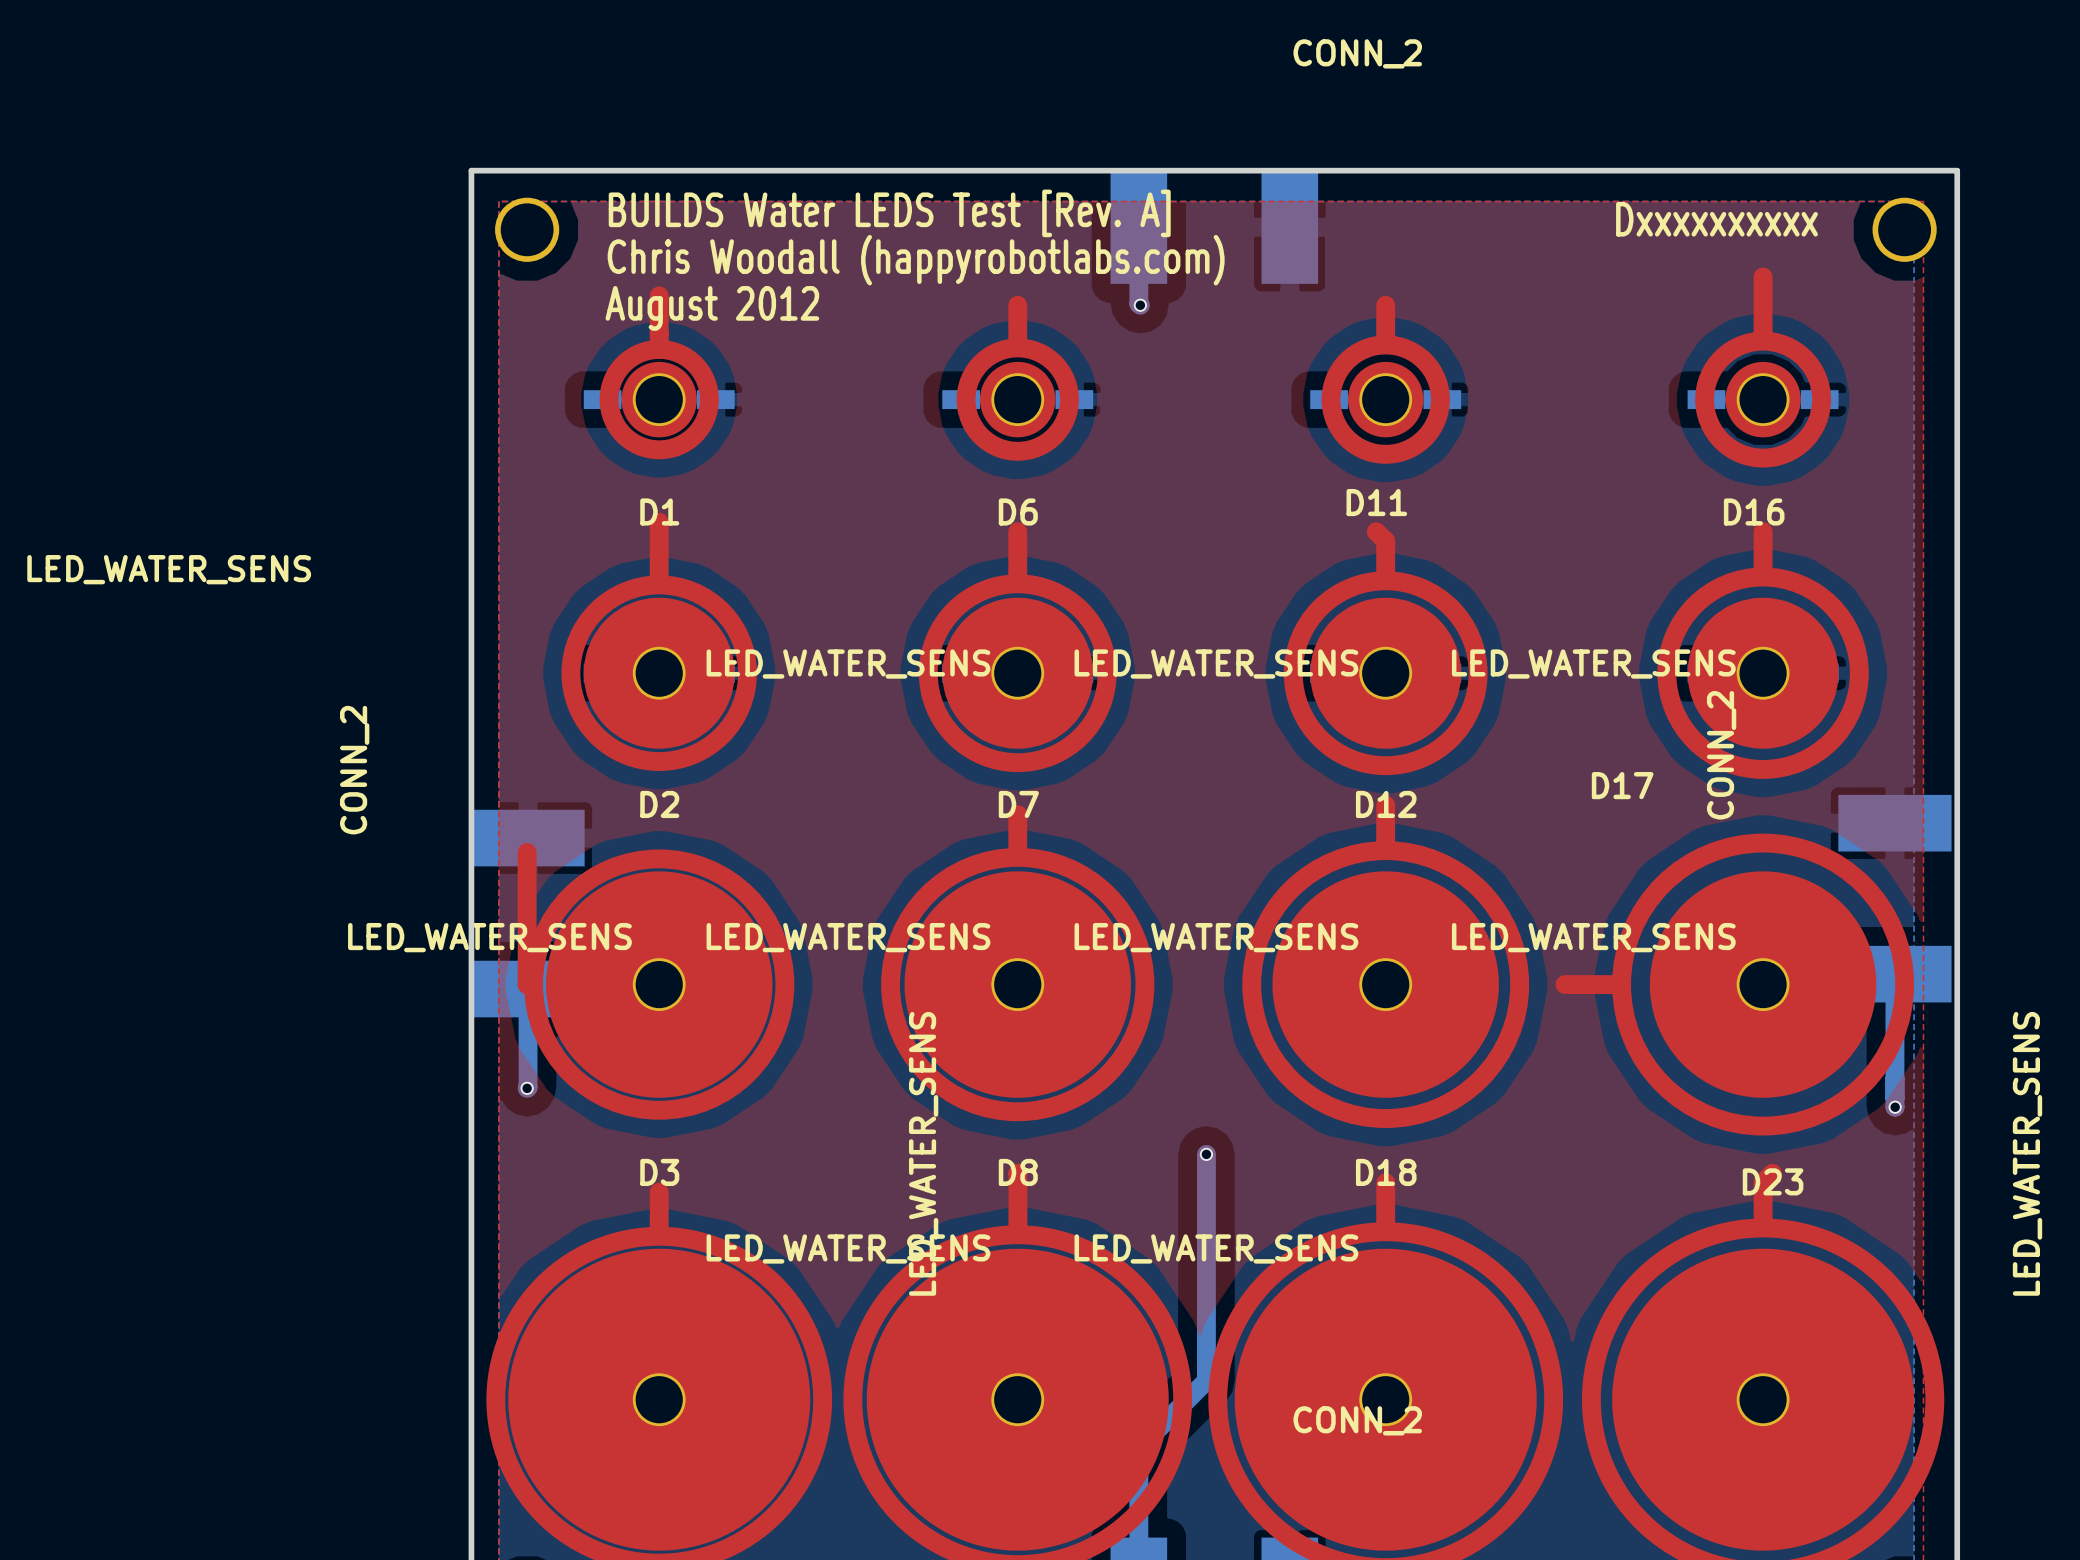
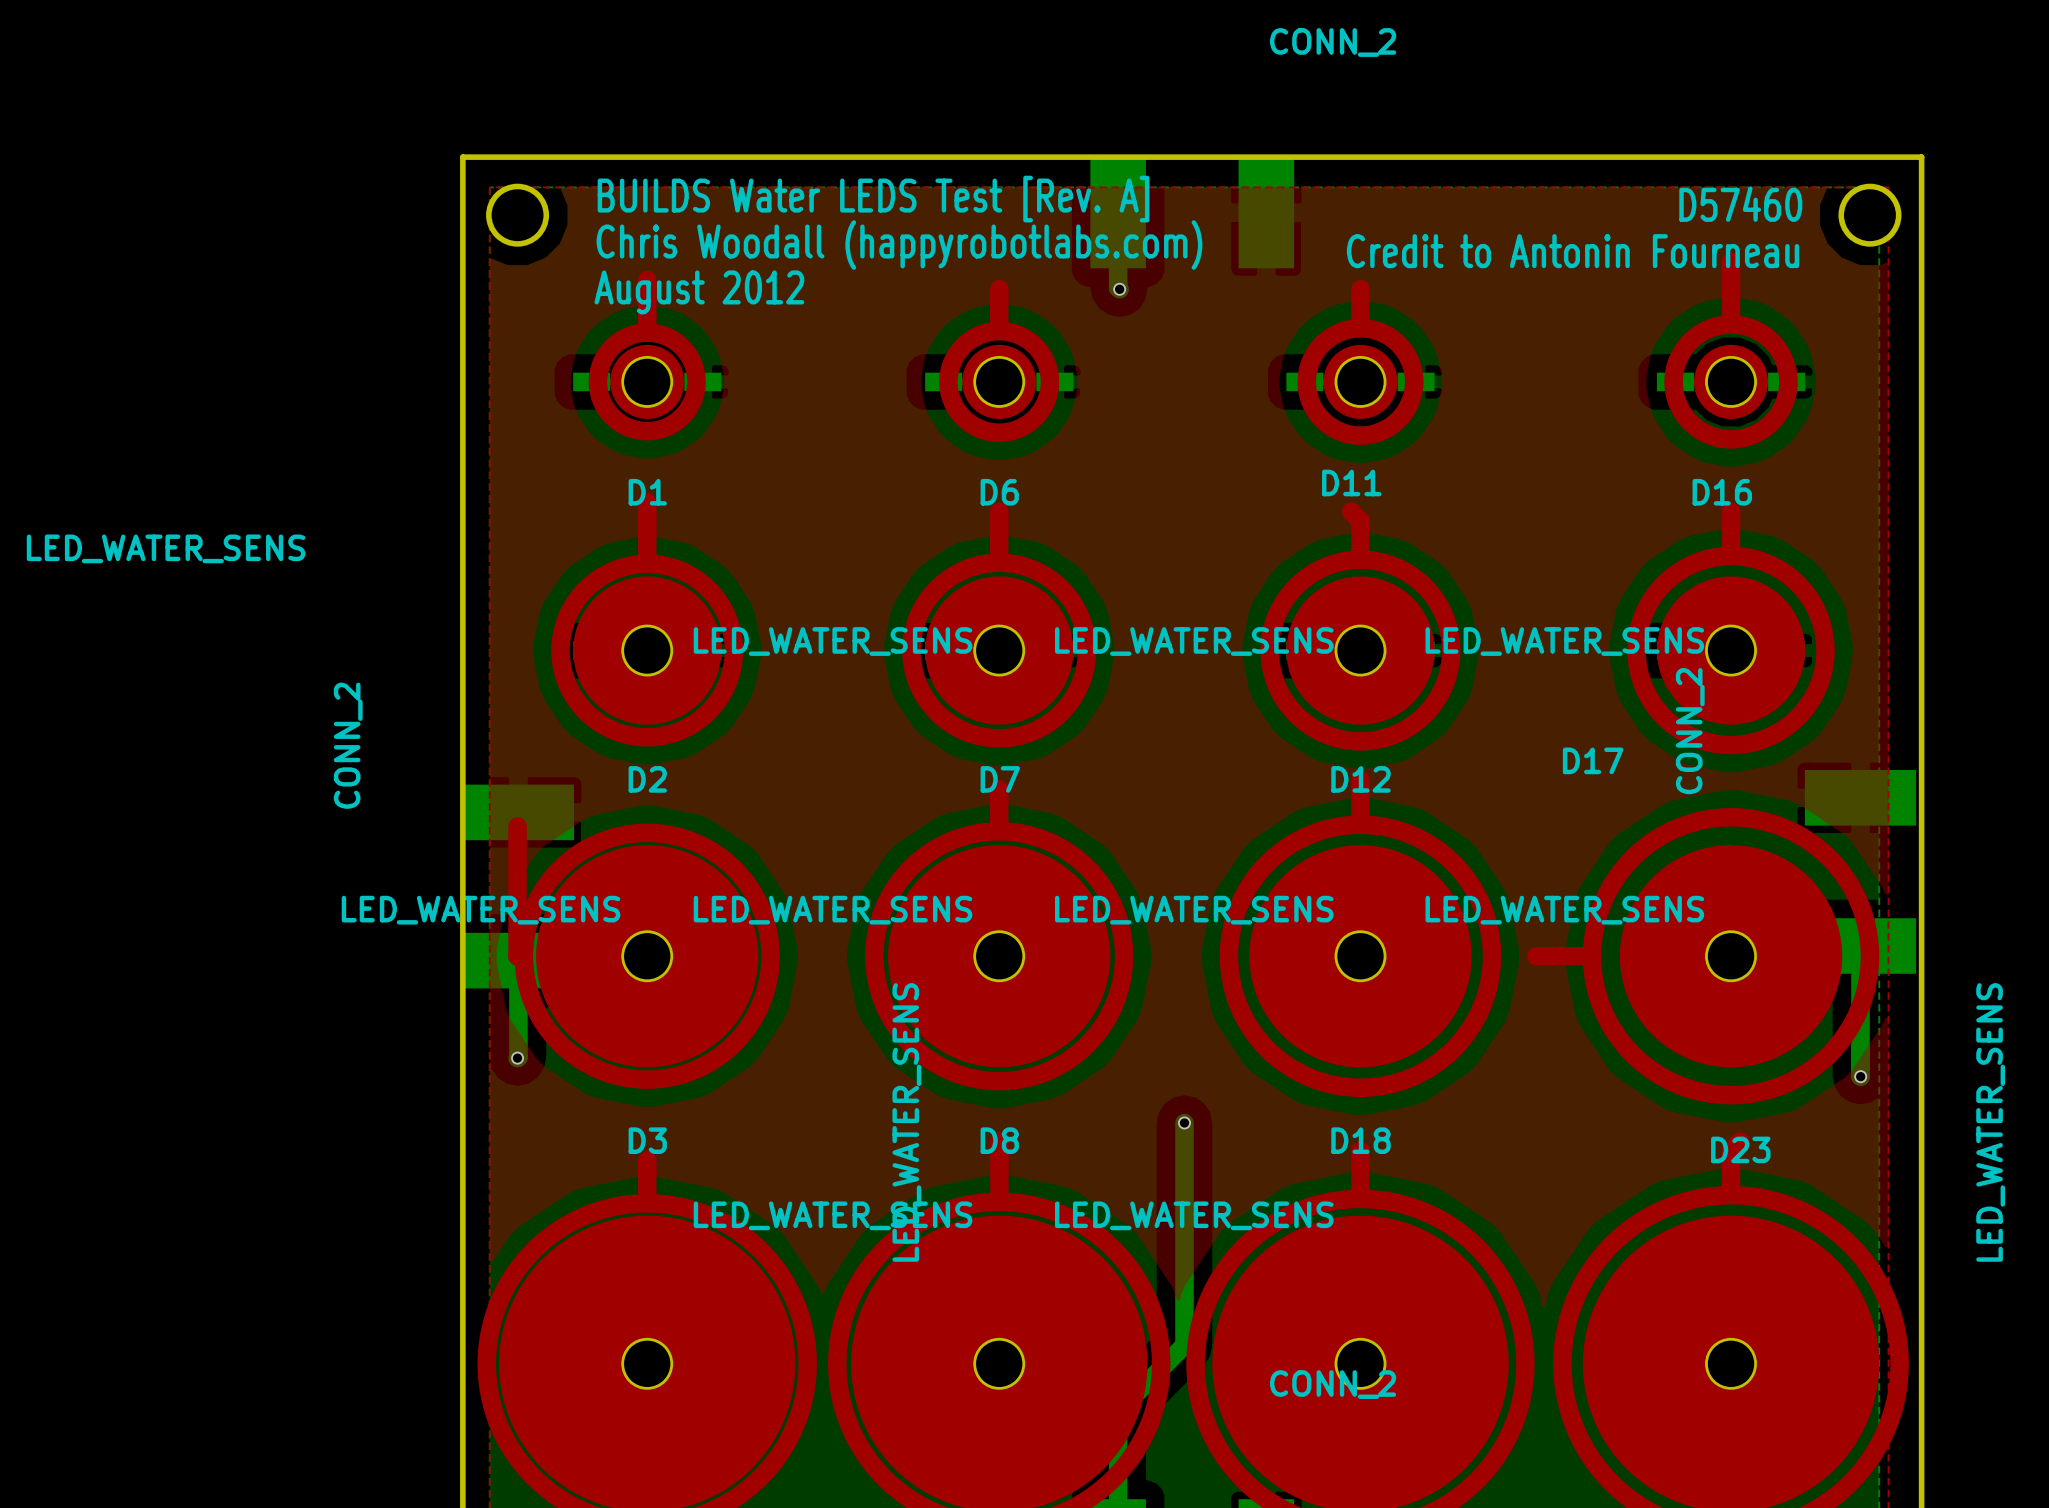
text: none -> D57460 (1740, 204)
text: Dxxxxxxxxxx (1716, 219) -> none
text: none -> Credit to Antonin Fourneau (1573, 251)

